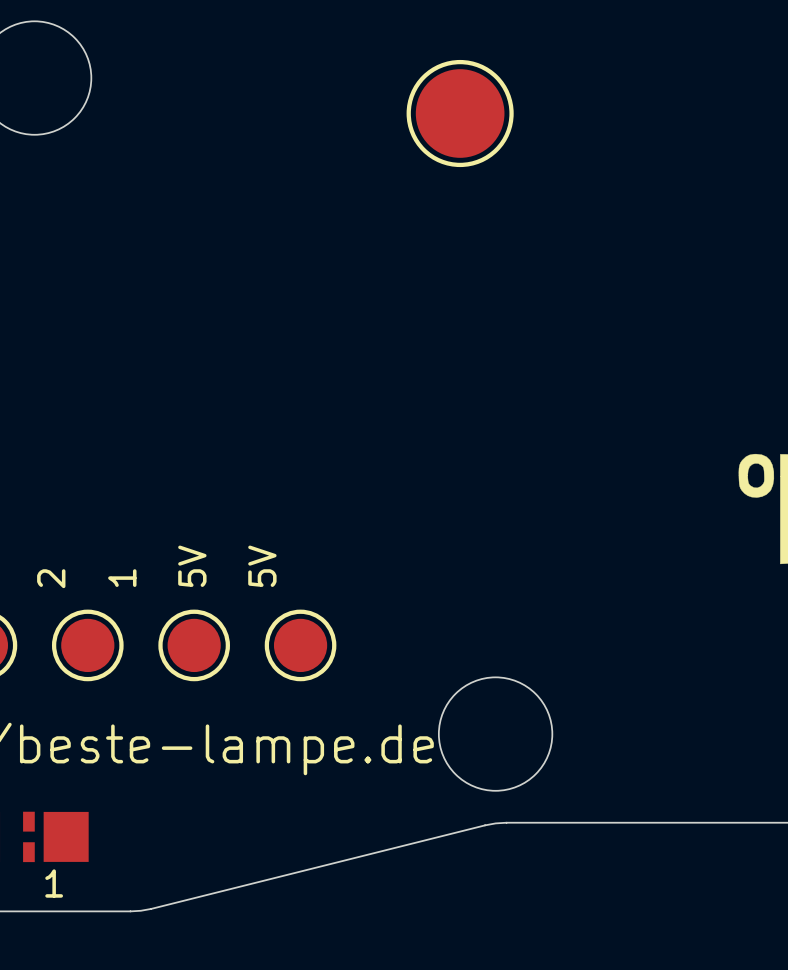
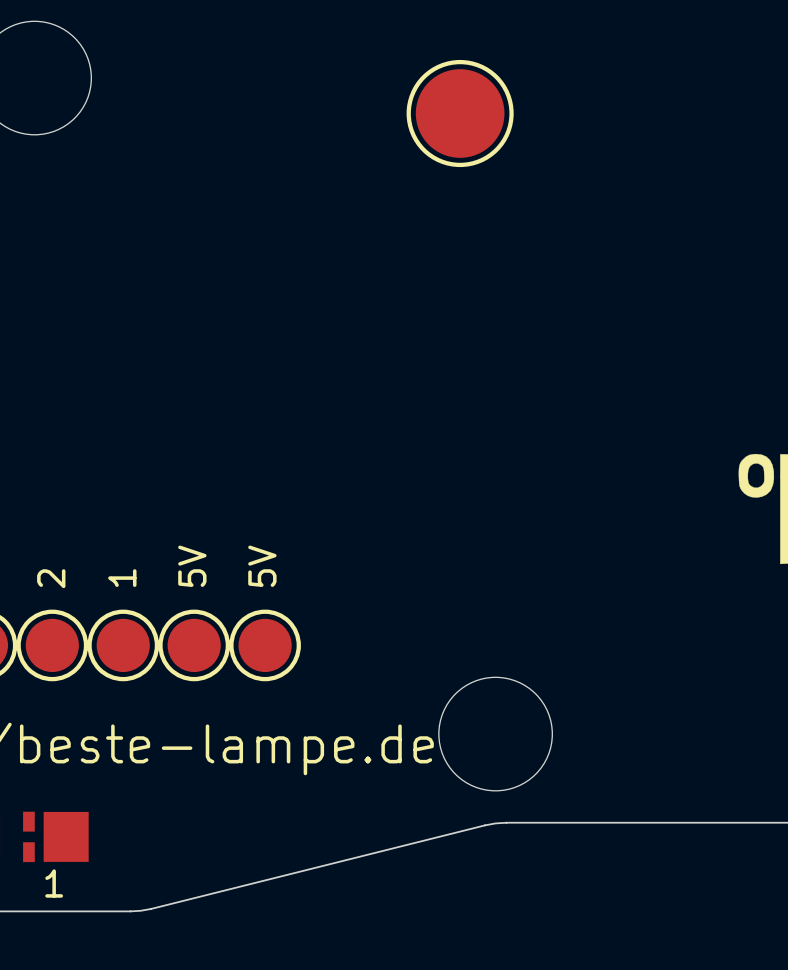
part: none -> (52, 645)
part: (87, 645) -> none
part: none -> (123, 645)
part position: (300, 645) -> (265, 645)

